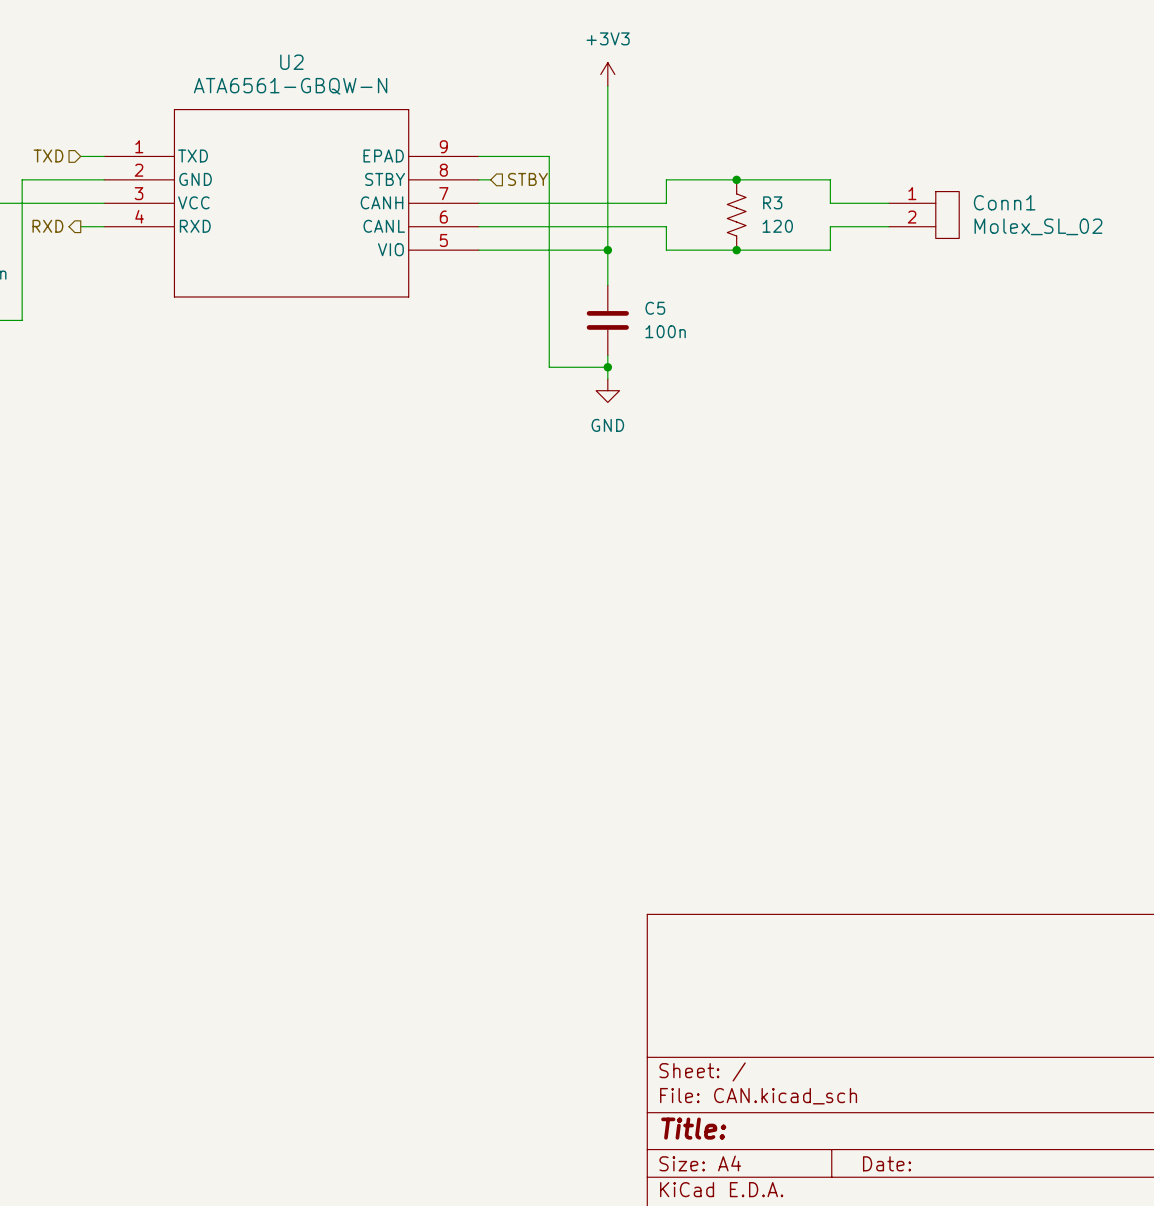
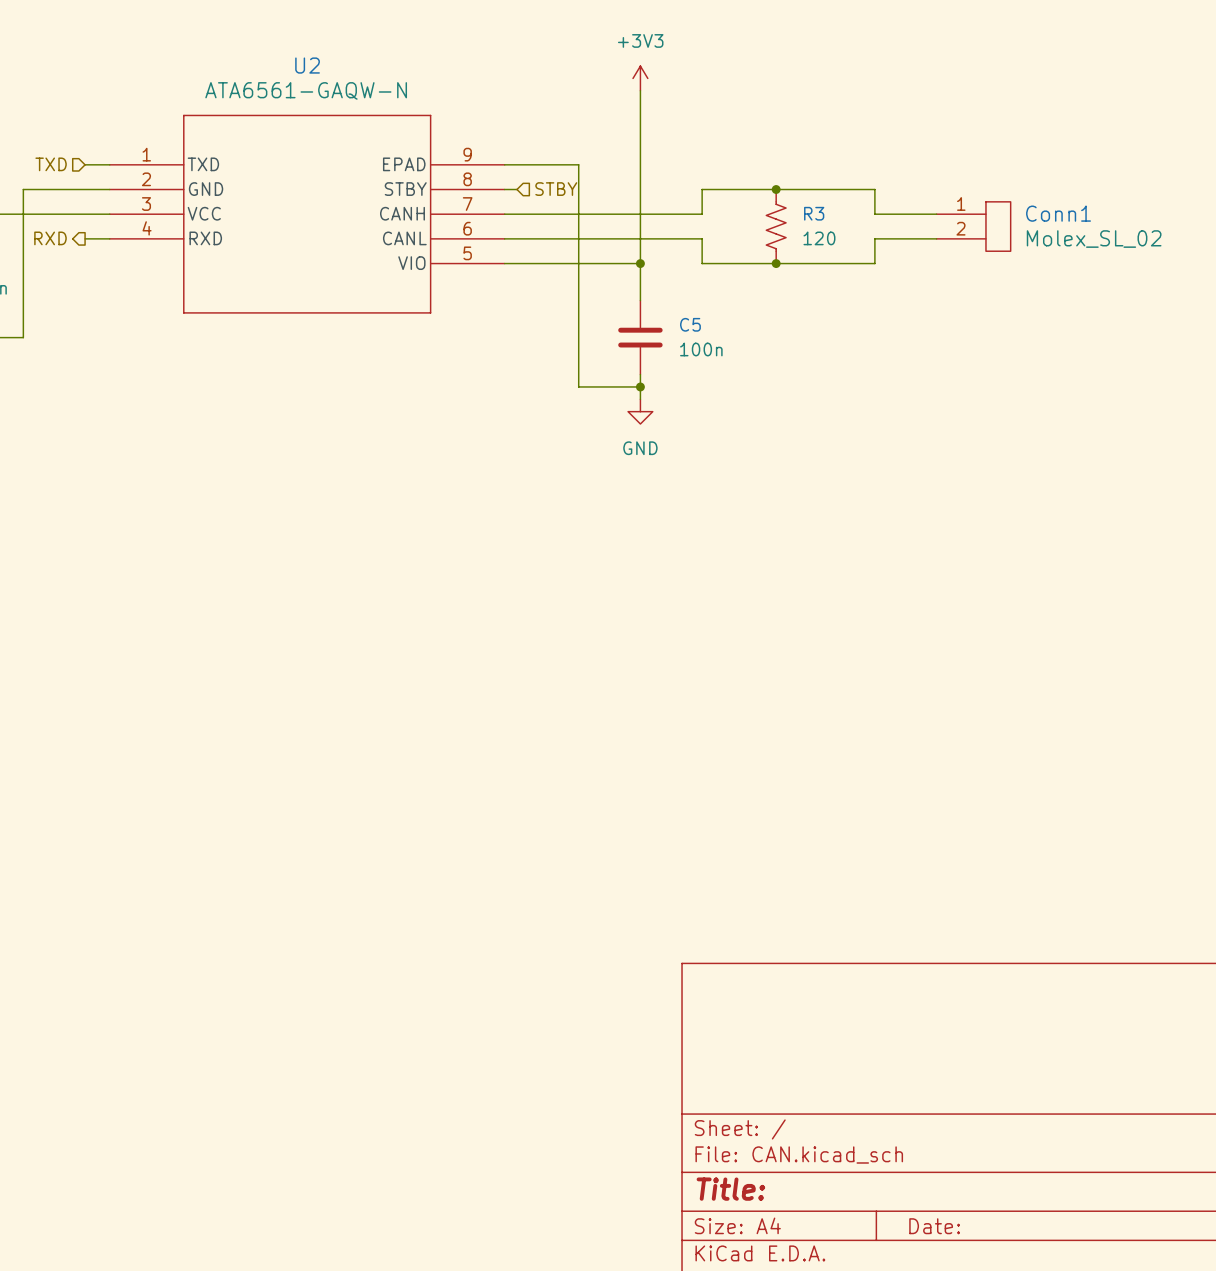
U2 value: ATA6561-GBQW-N (290, 86) -> ATA6561-GAQW-N (306, 90)

